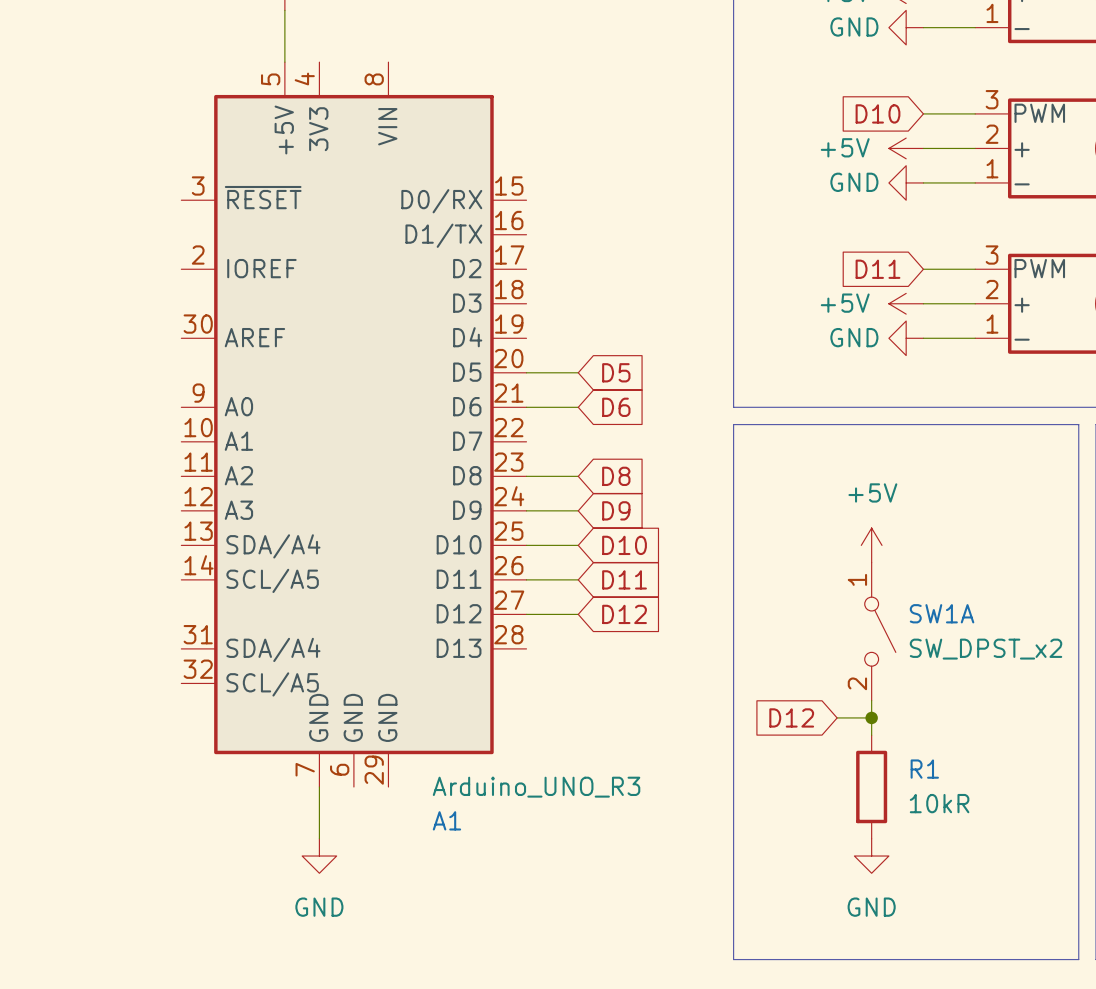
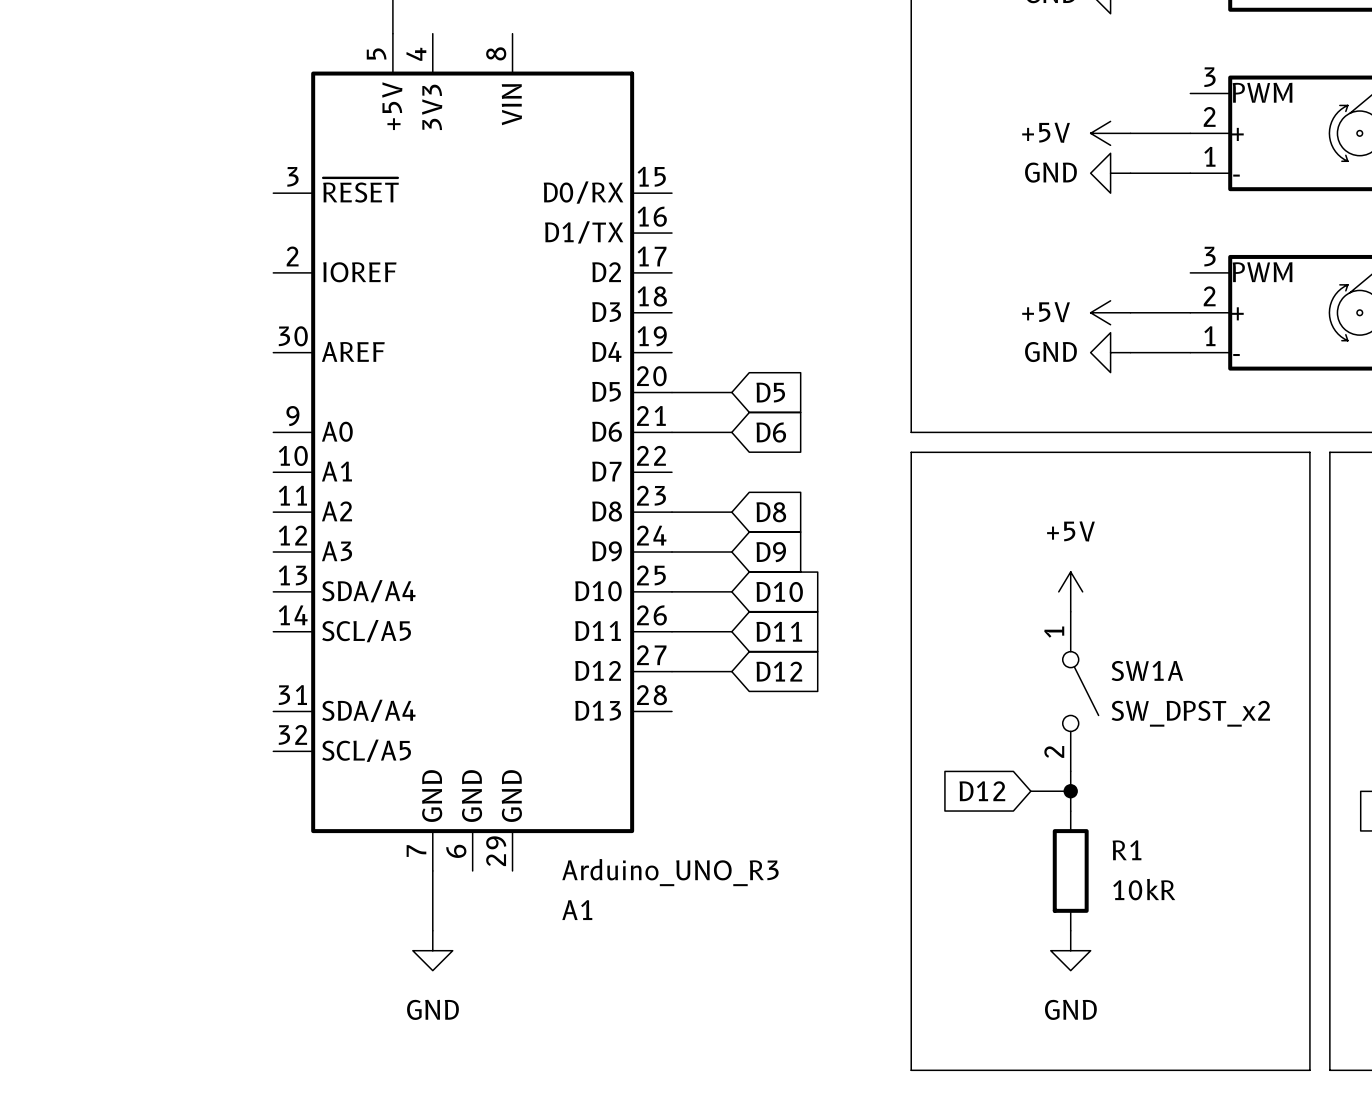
global label: D10 (877, 113) -> none
wire: (923, 113) (975, 113) -> none
global label: D11 (877, 269) -> none
wire: (923, 269) (975, 269) -> none

